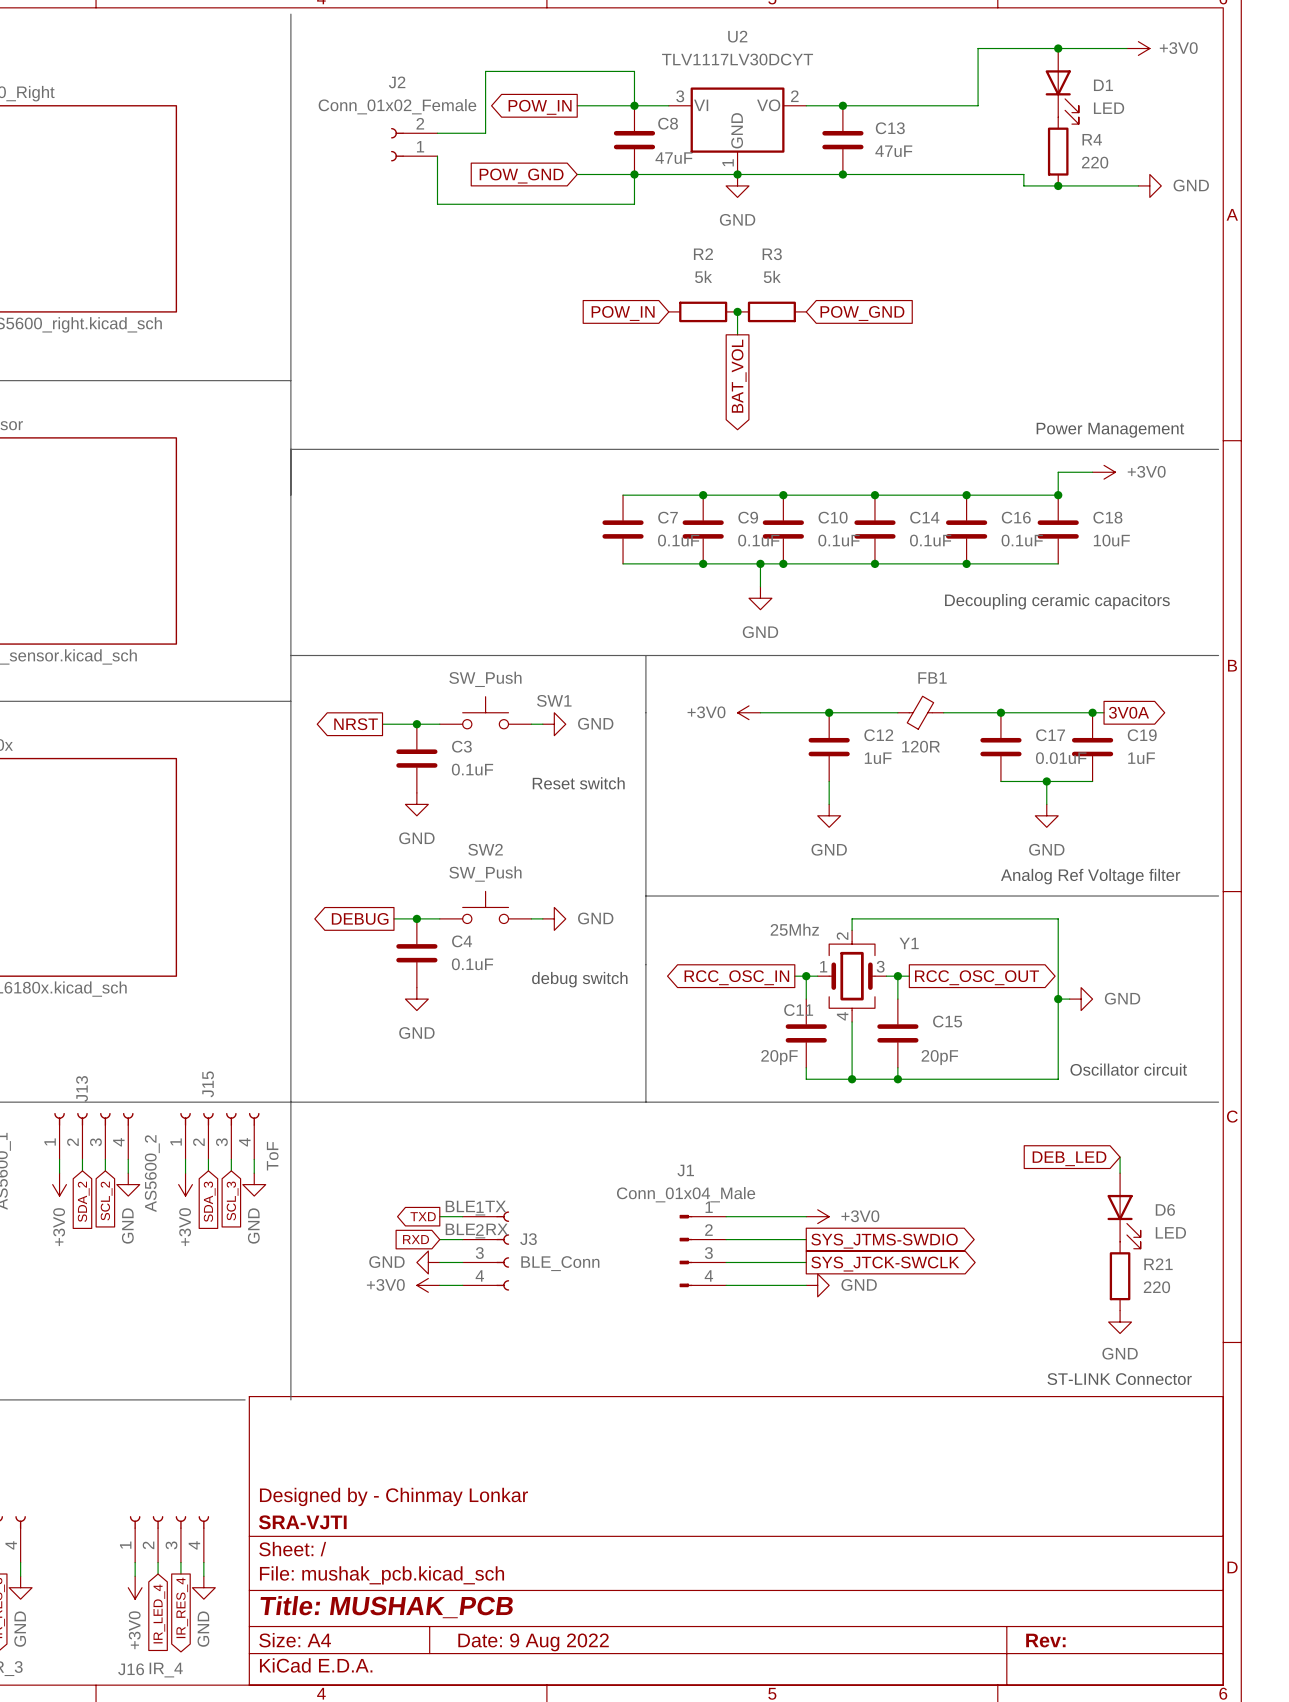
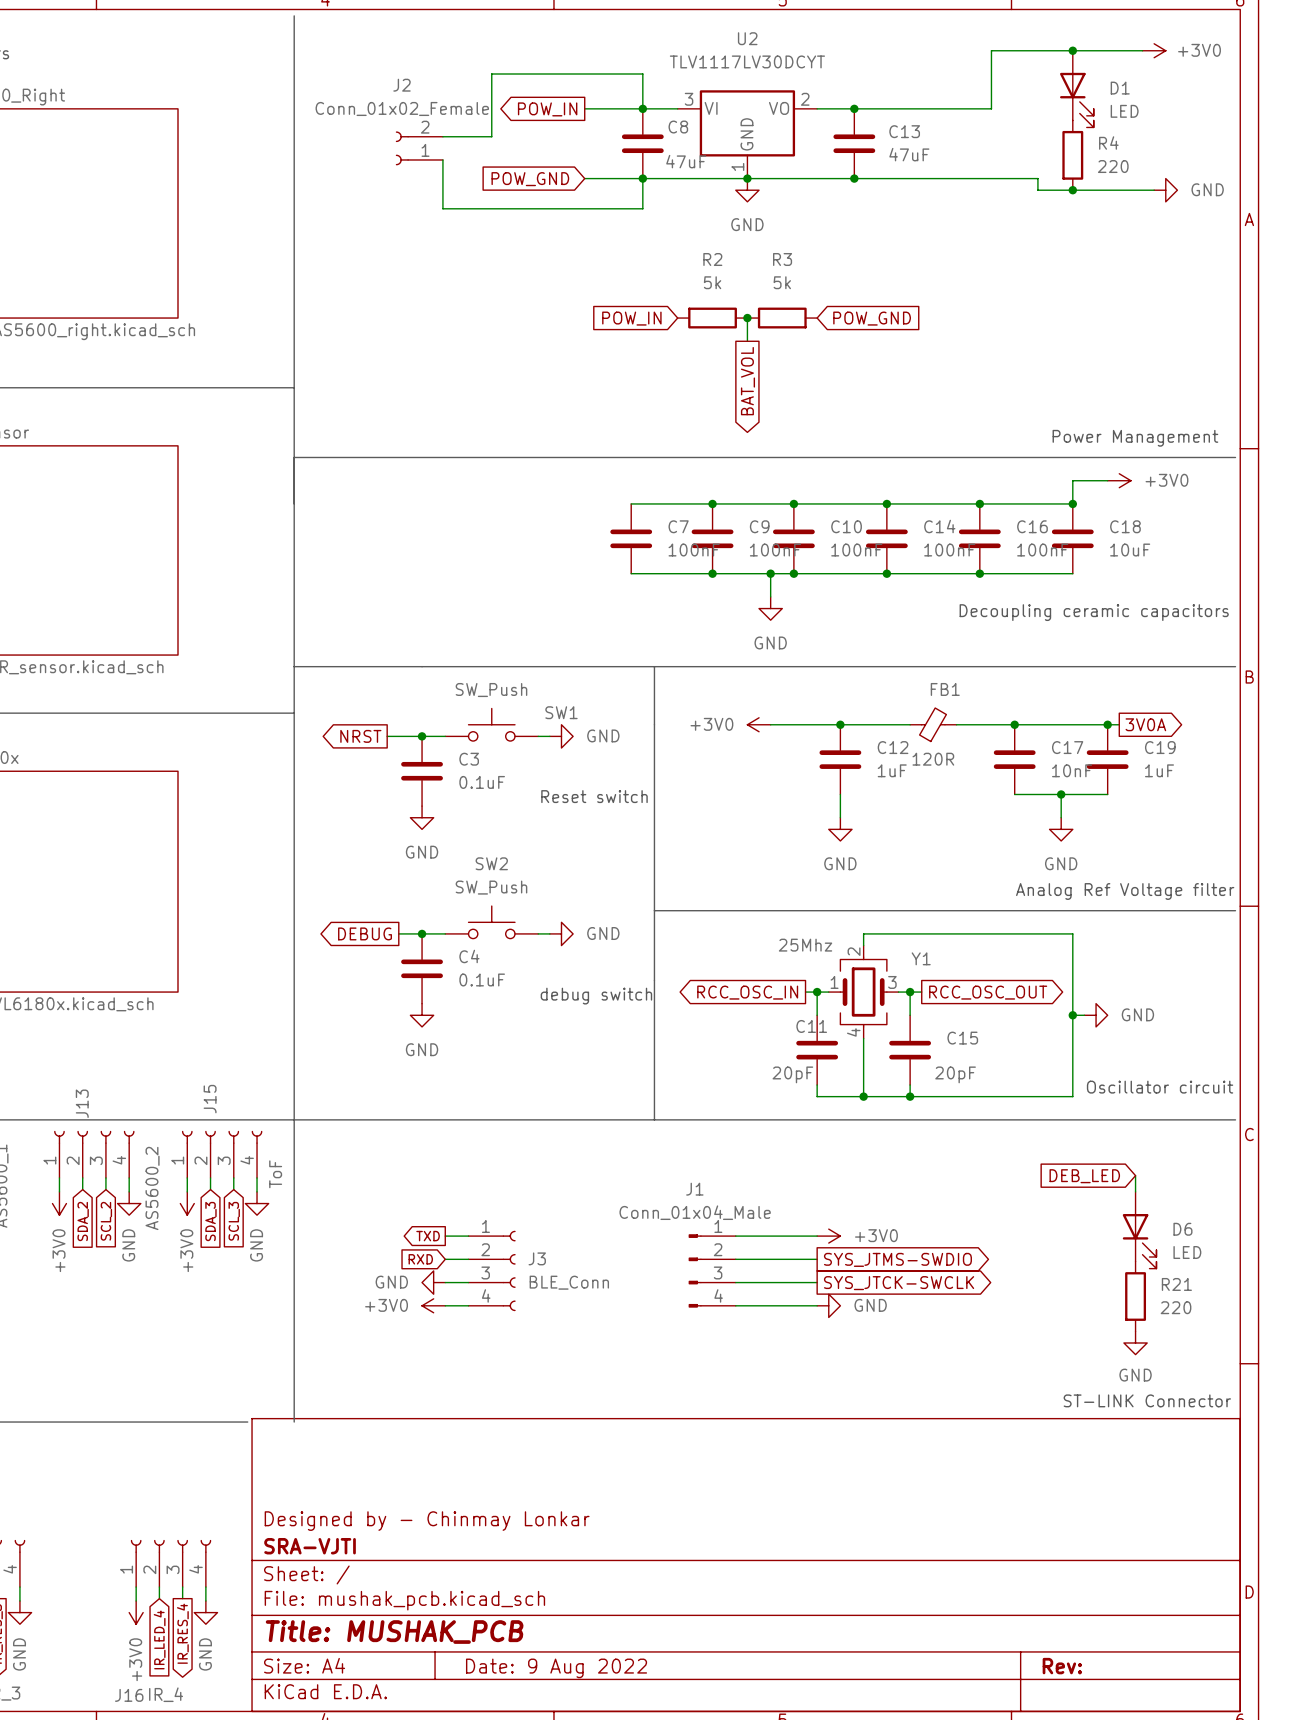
C7 value: 0.1uF (678, 540) -> 100nF (694, 550)
C9 value: 0.1uF (758, 540) -> 100nF (775, 550)
C10 value: 0.1uF (838, 540) -> 100nF (856, 550)
C14 value: 0.1uF (930, 540) -> 100nF (949, 550)
C16 value: 0.1uF (1022, 540) -> 100nF (1042, 550)
C17 value: 0.01uF (1061, 758) -> 10nF (1072, 770)
label: BLE_TX (475, 1208) -> none
label: BLE_RX (476, 1231) -> none

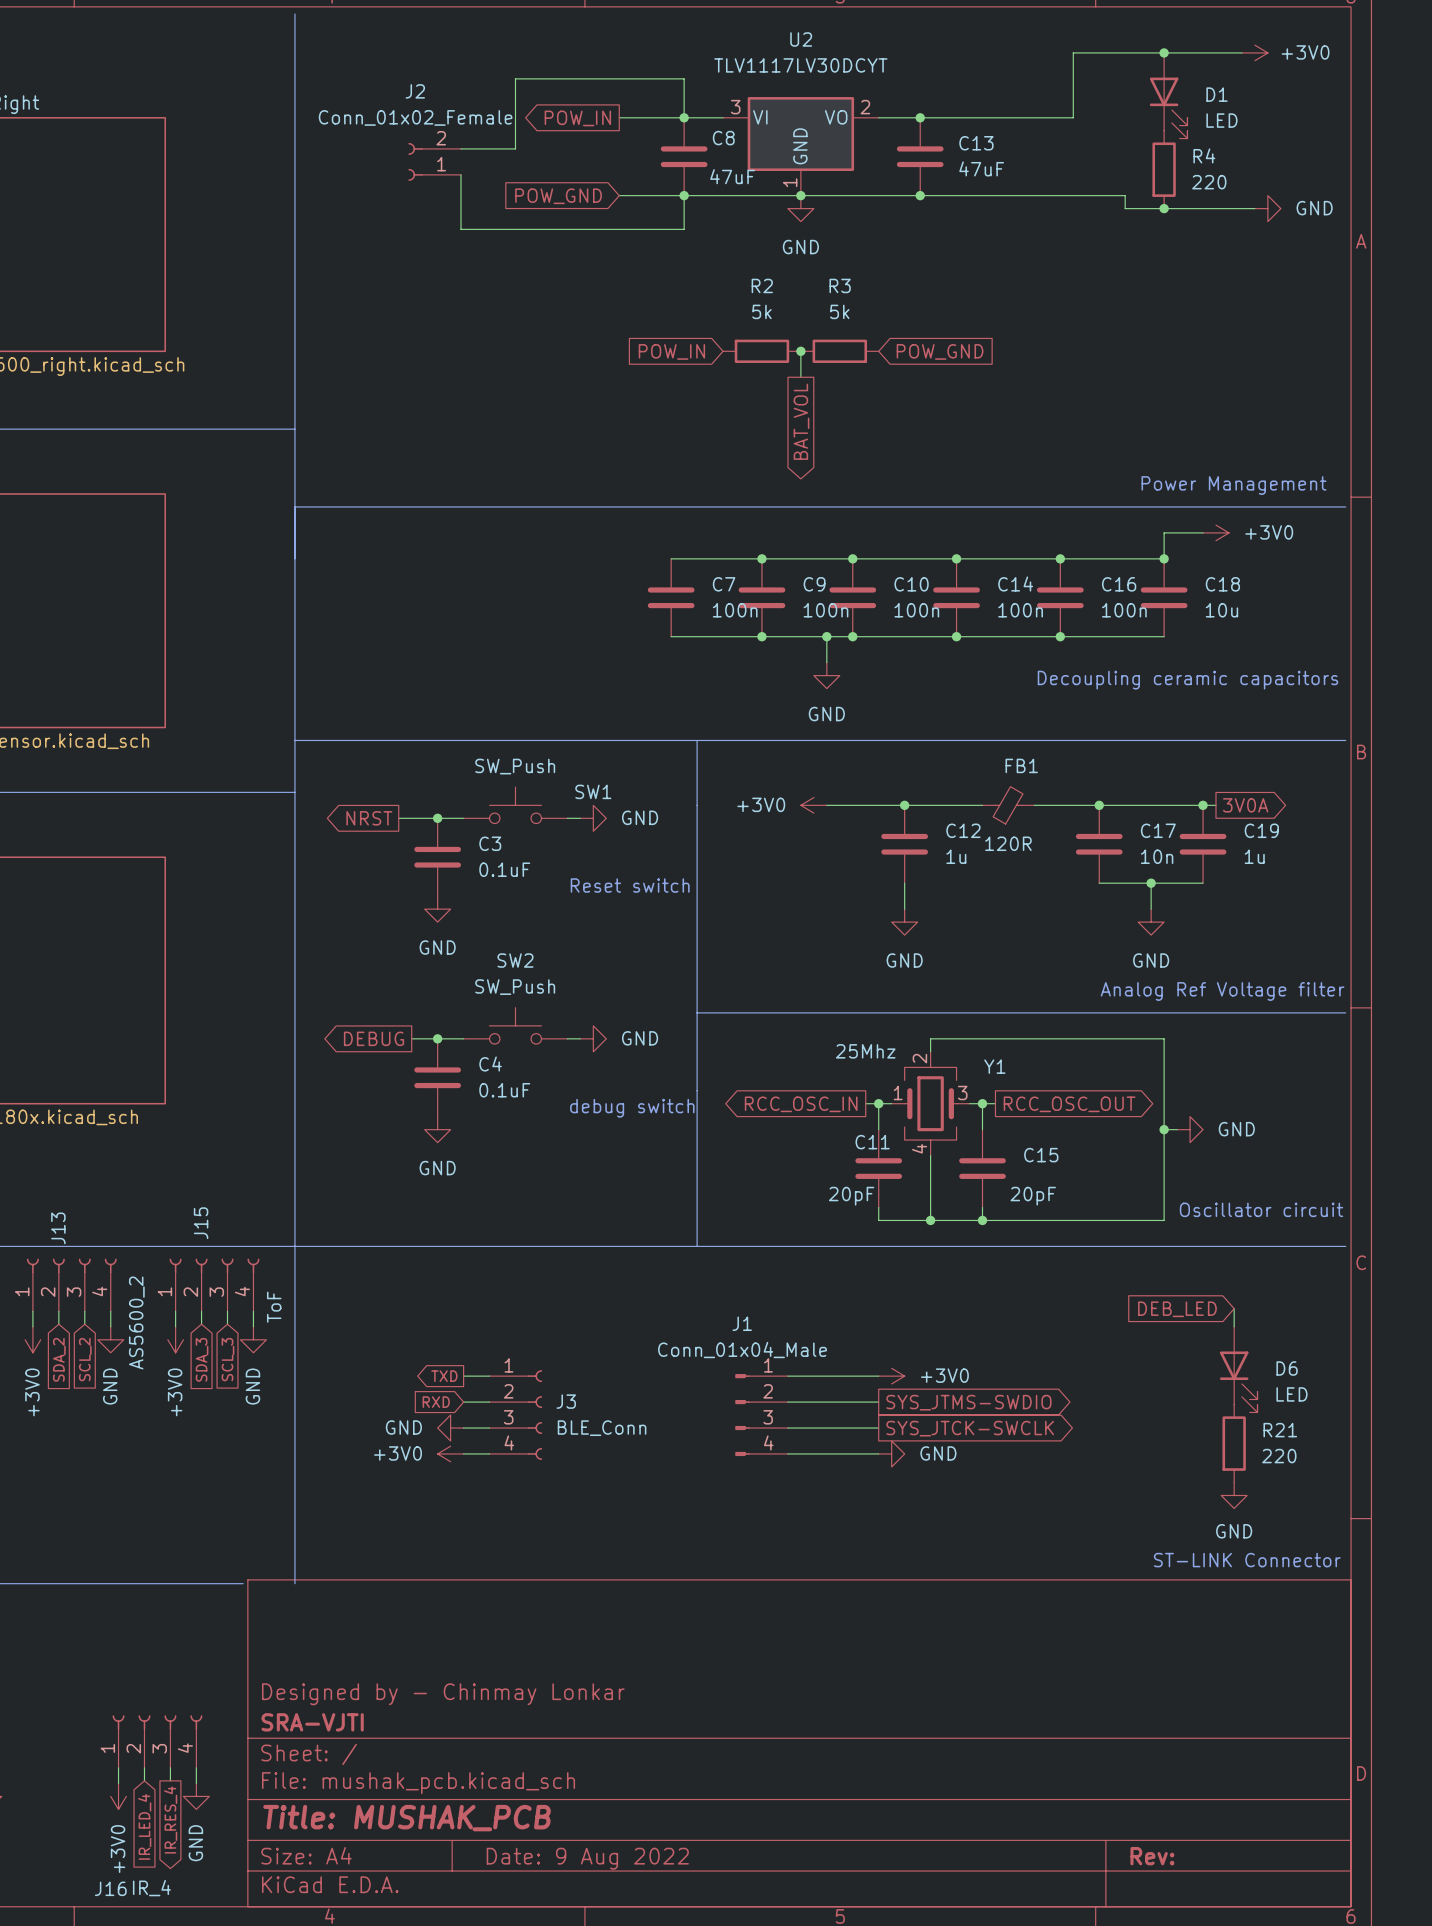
C7 value: 100nF (694, 550) -> 100n (735, 610)
C9 value: 100nF (775, 550) -> 100n (825, 610)
C10 value: 100nF (856, 550) -> 100n (916, 610)
C14 value: 100nF (949, 550) -> 100n (1020, 610)
C16 value: 100nF (1042, 550) -> 100n (1124, 610)
C18 value: 10uF (1130, 550) -> 10u (1221, 610)
C12 value: 1uF (892, 770) -> 1u (956, 856)
C17 value: 10nF (1072, 770) -> 10n (1157, 856)
C19 value: 1uF (1159, 770) -> 1u (1254, 856)

